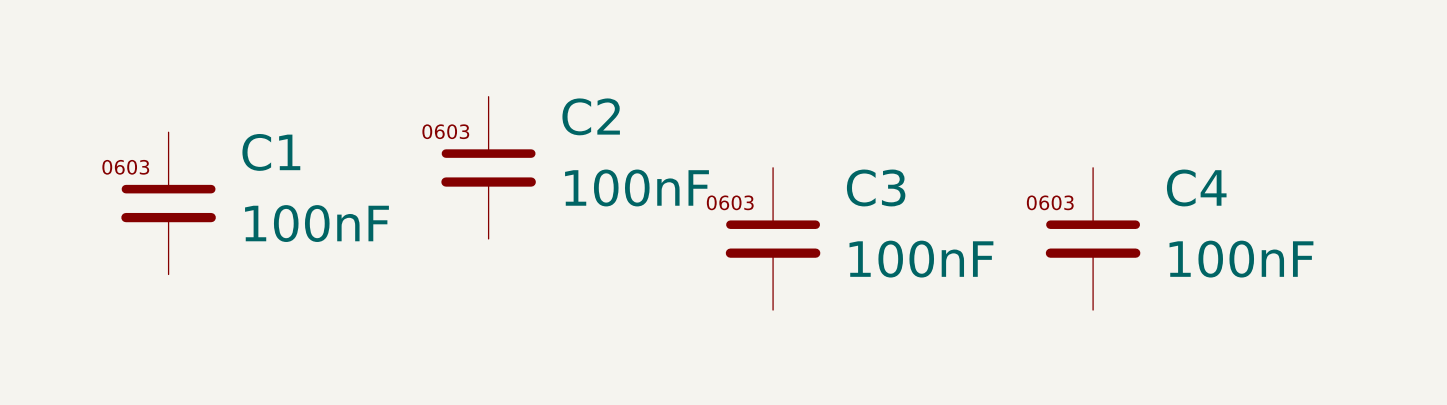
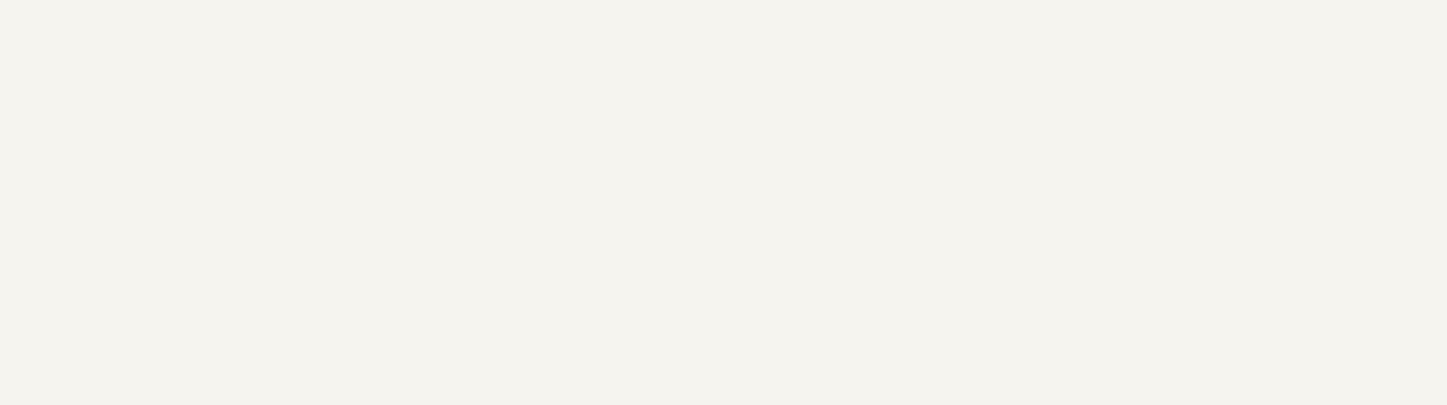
C2: 100nF (488, 167) -> none
C1: 100nF (168, 203) -> none
C3: 100nF (773, 238) -> none
C4: 100nF (1093, 238) -> none

